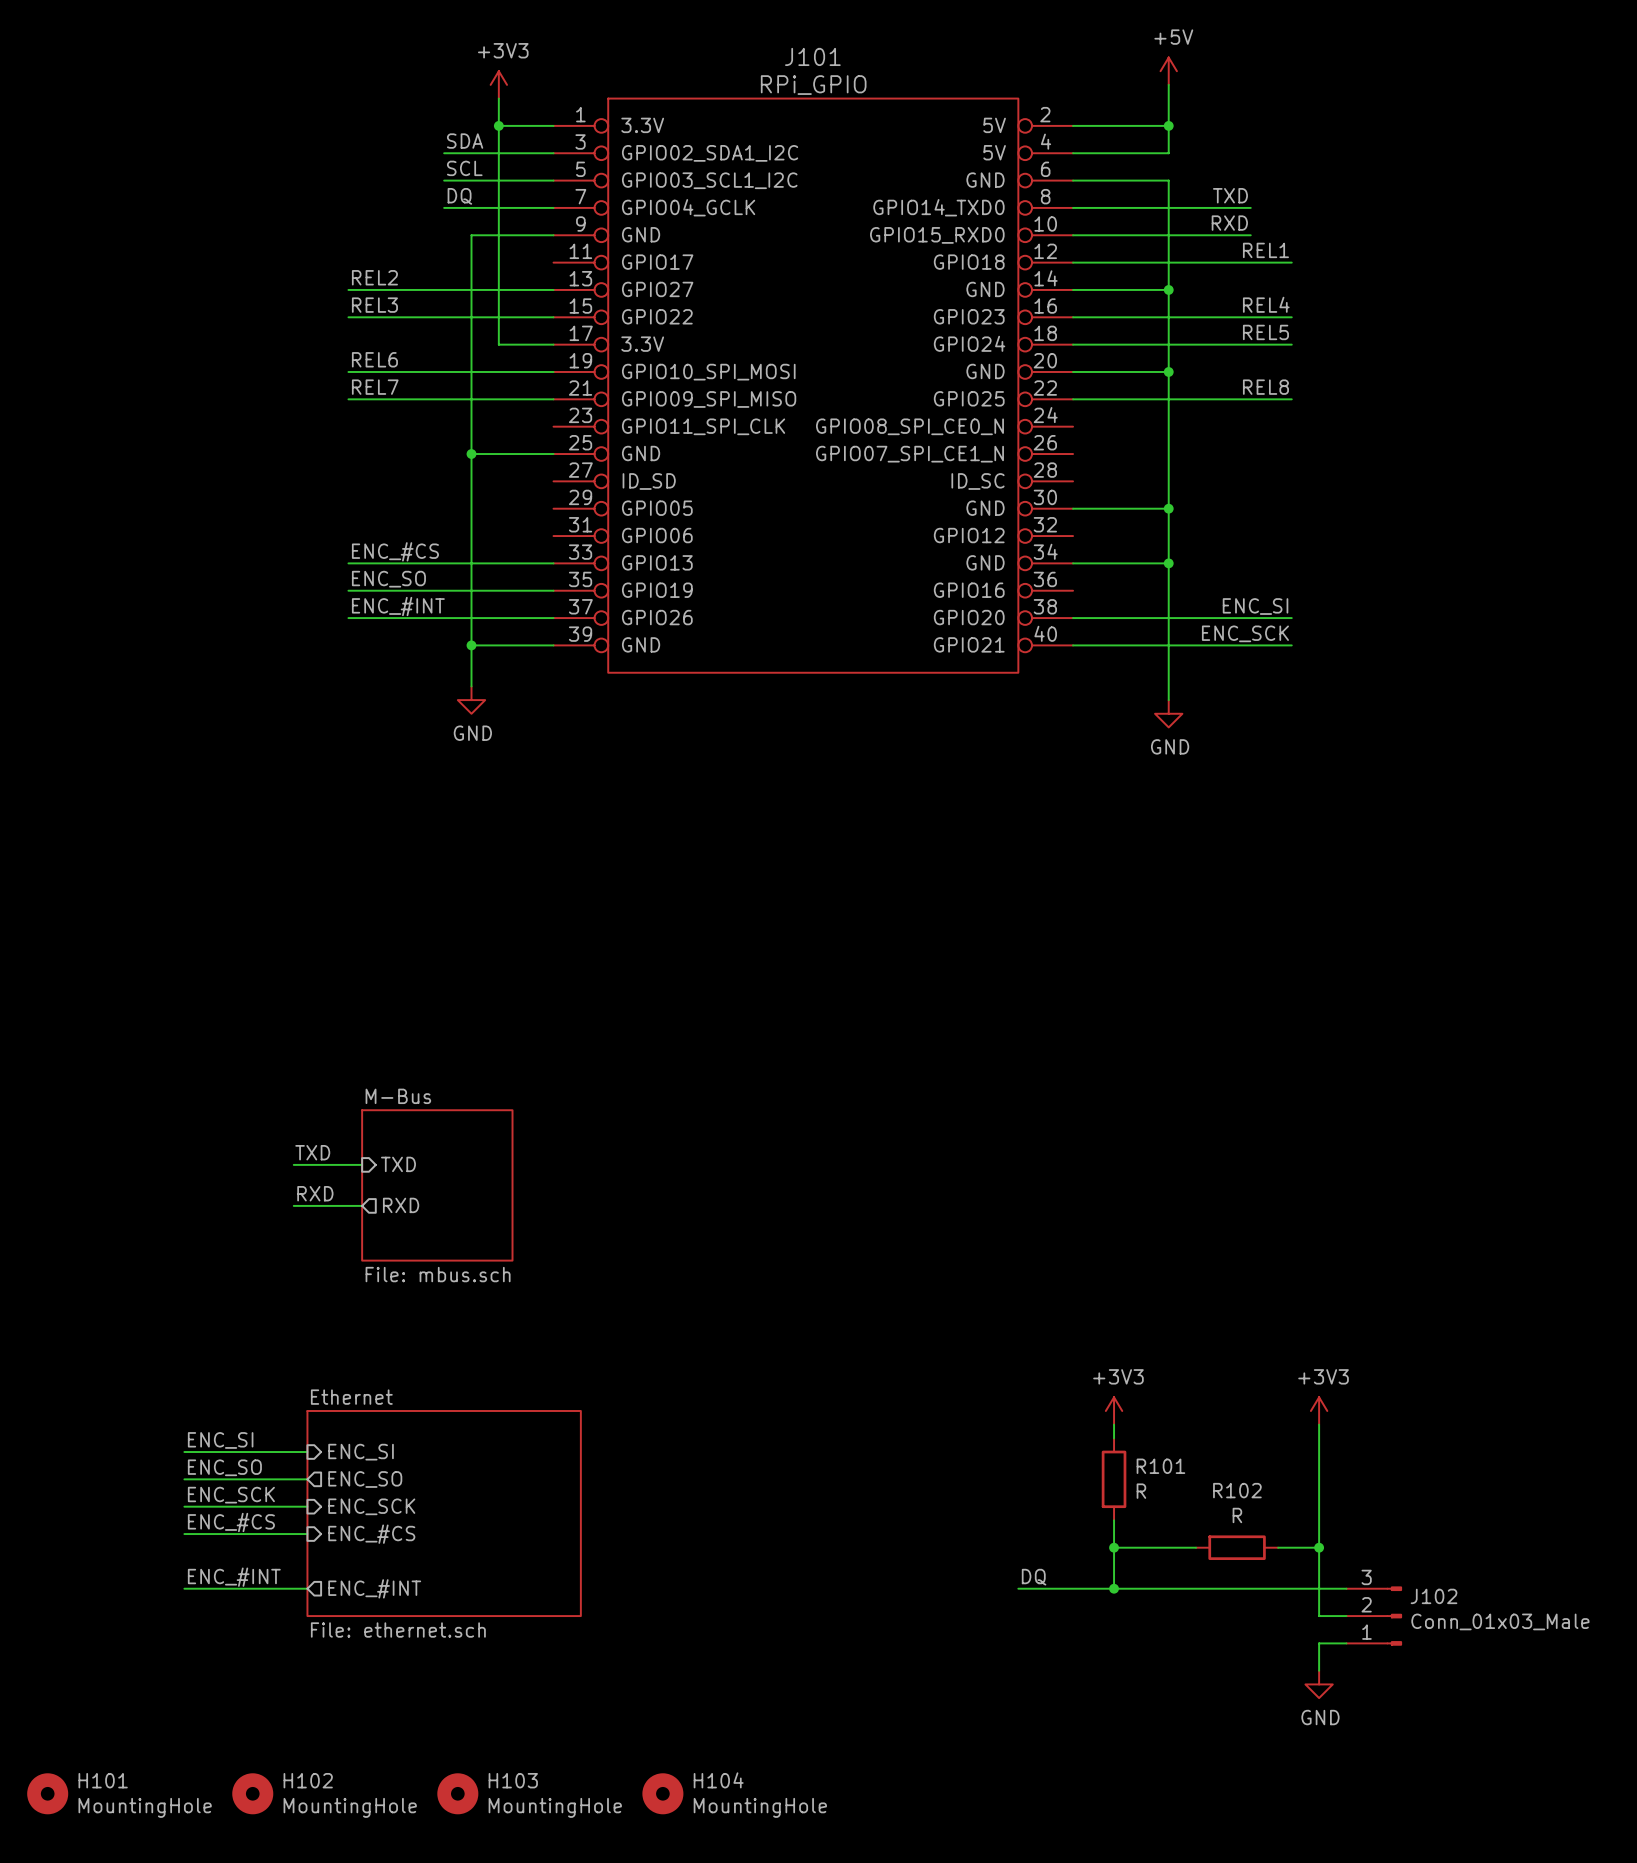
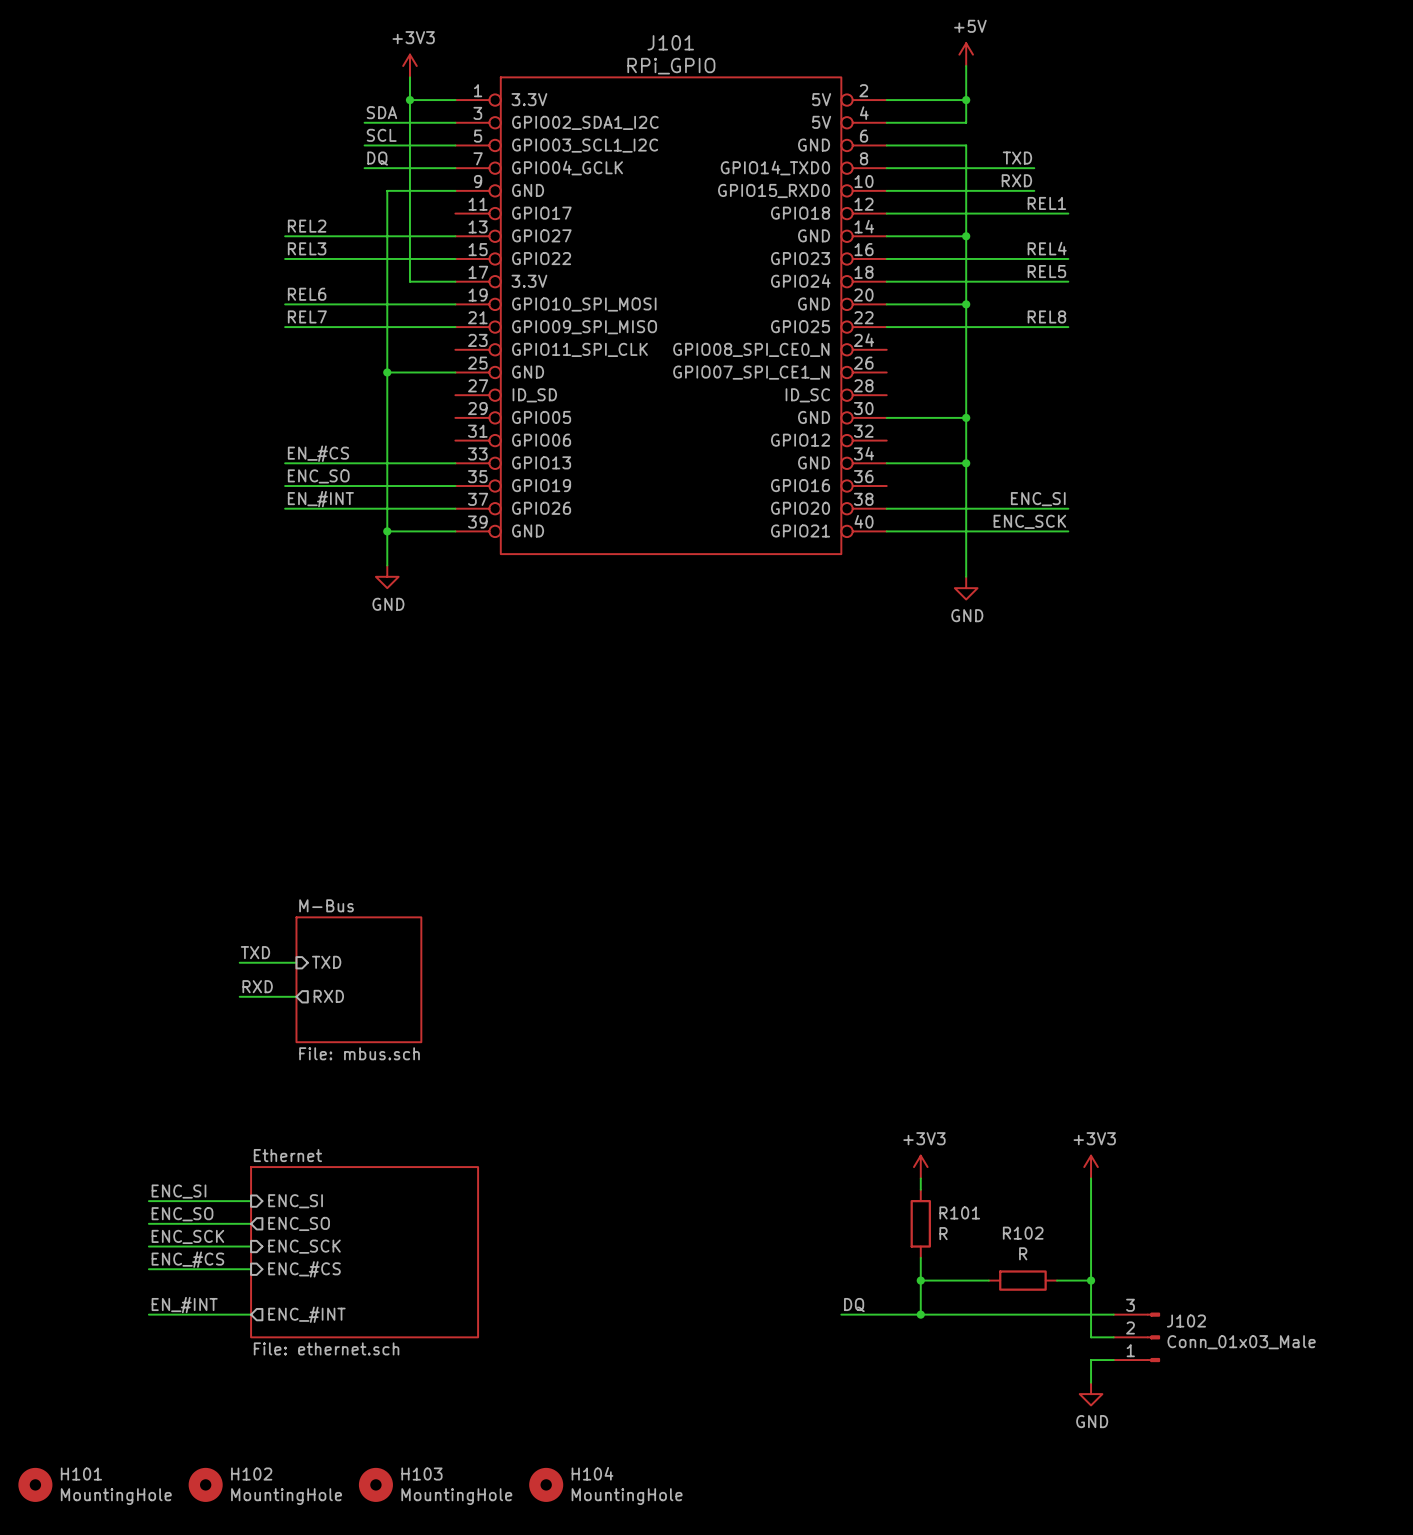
label: ENC_#CS (395, 551) -> EN_#CS (318, 453)
label: ENC_#INT (398, 606) -> EN_#INT (320, 499)
label: ENC_#INT (234, 1577) -> EN_#INT (184, 1305)

